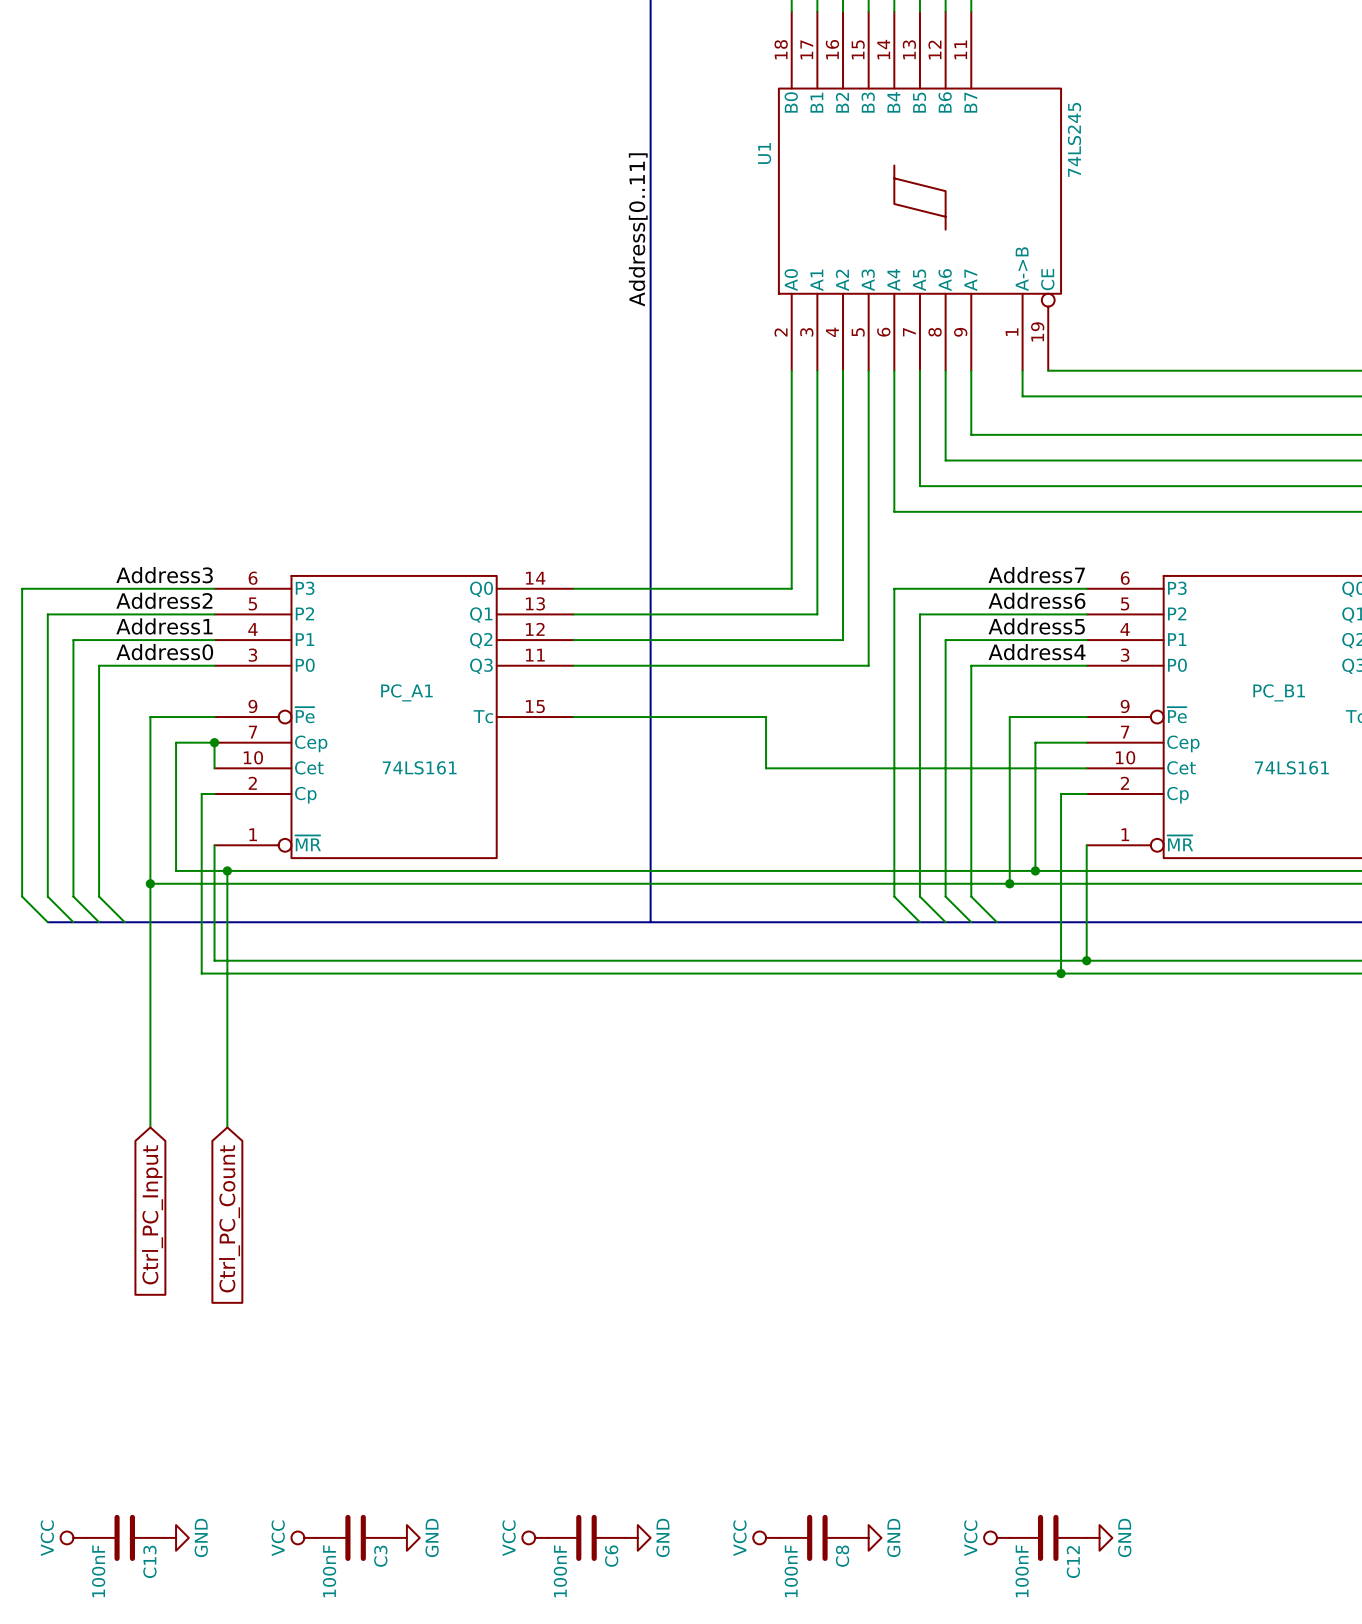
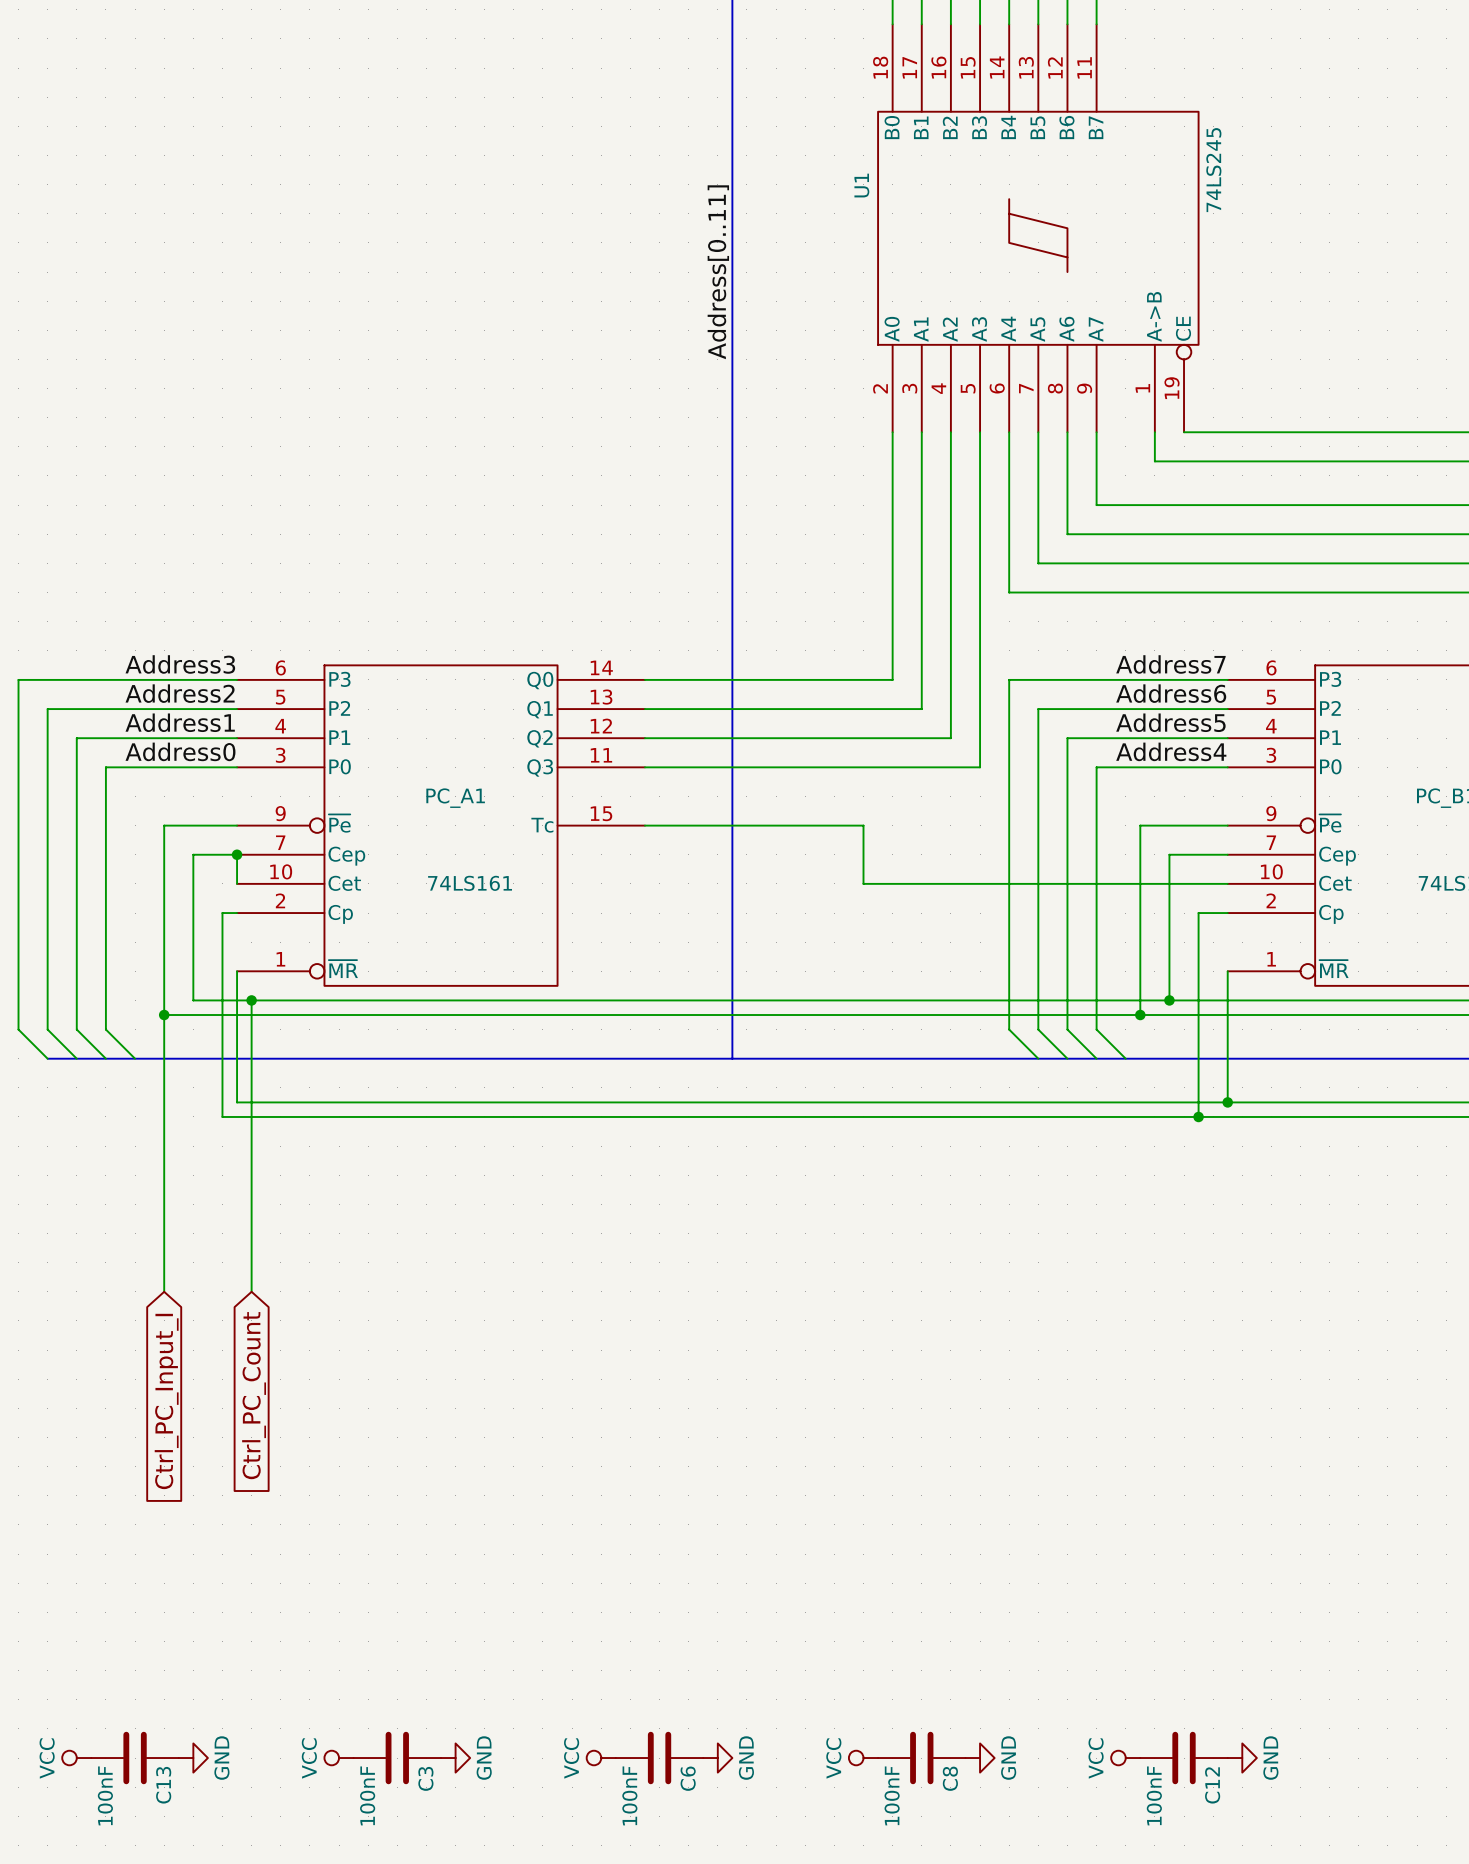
global label: Ctrl_PC_Input (152, 1214) -> Ctrl_PC_Input_I (166, 1401)

